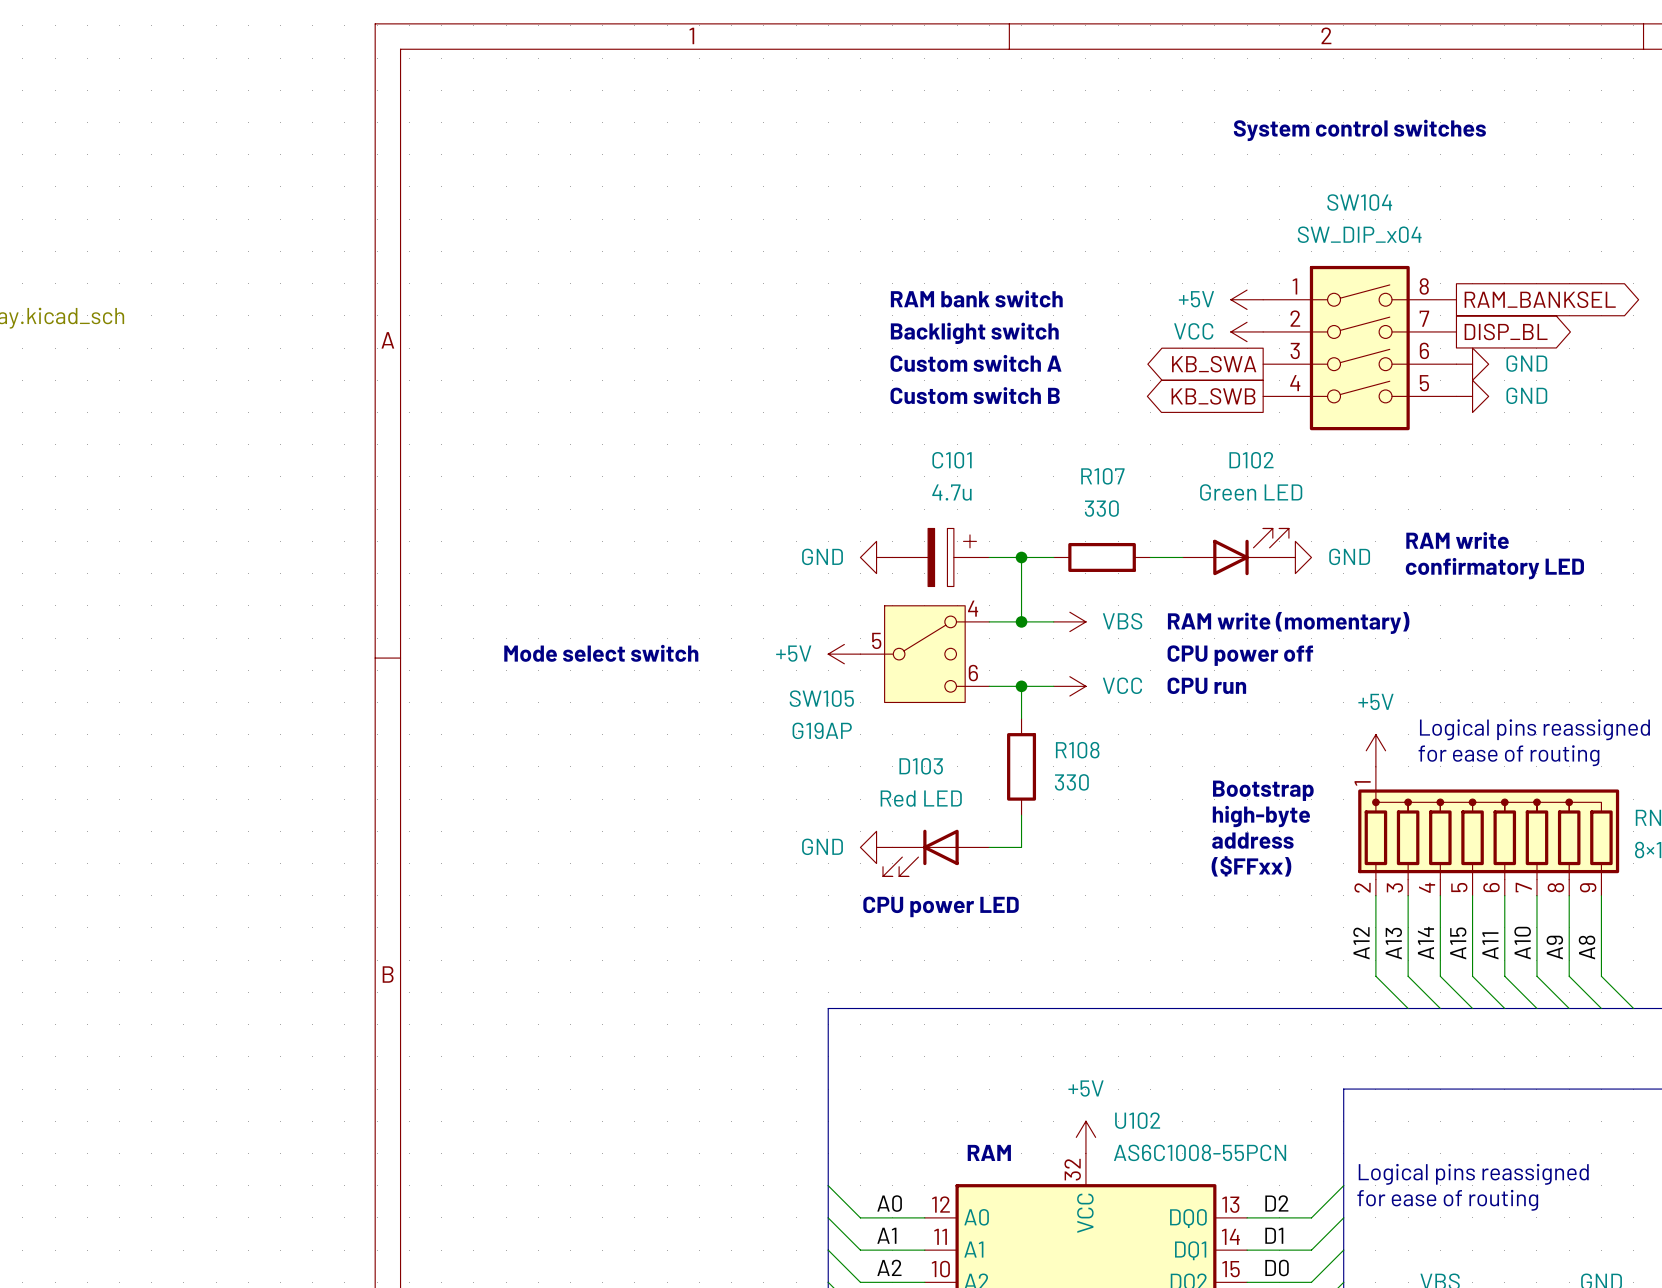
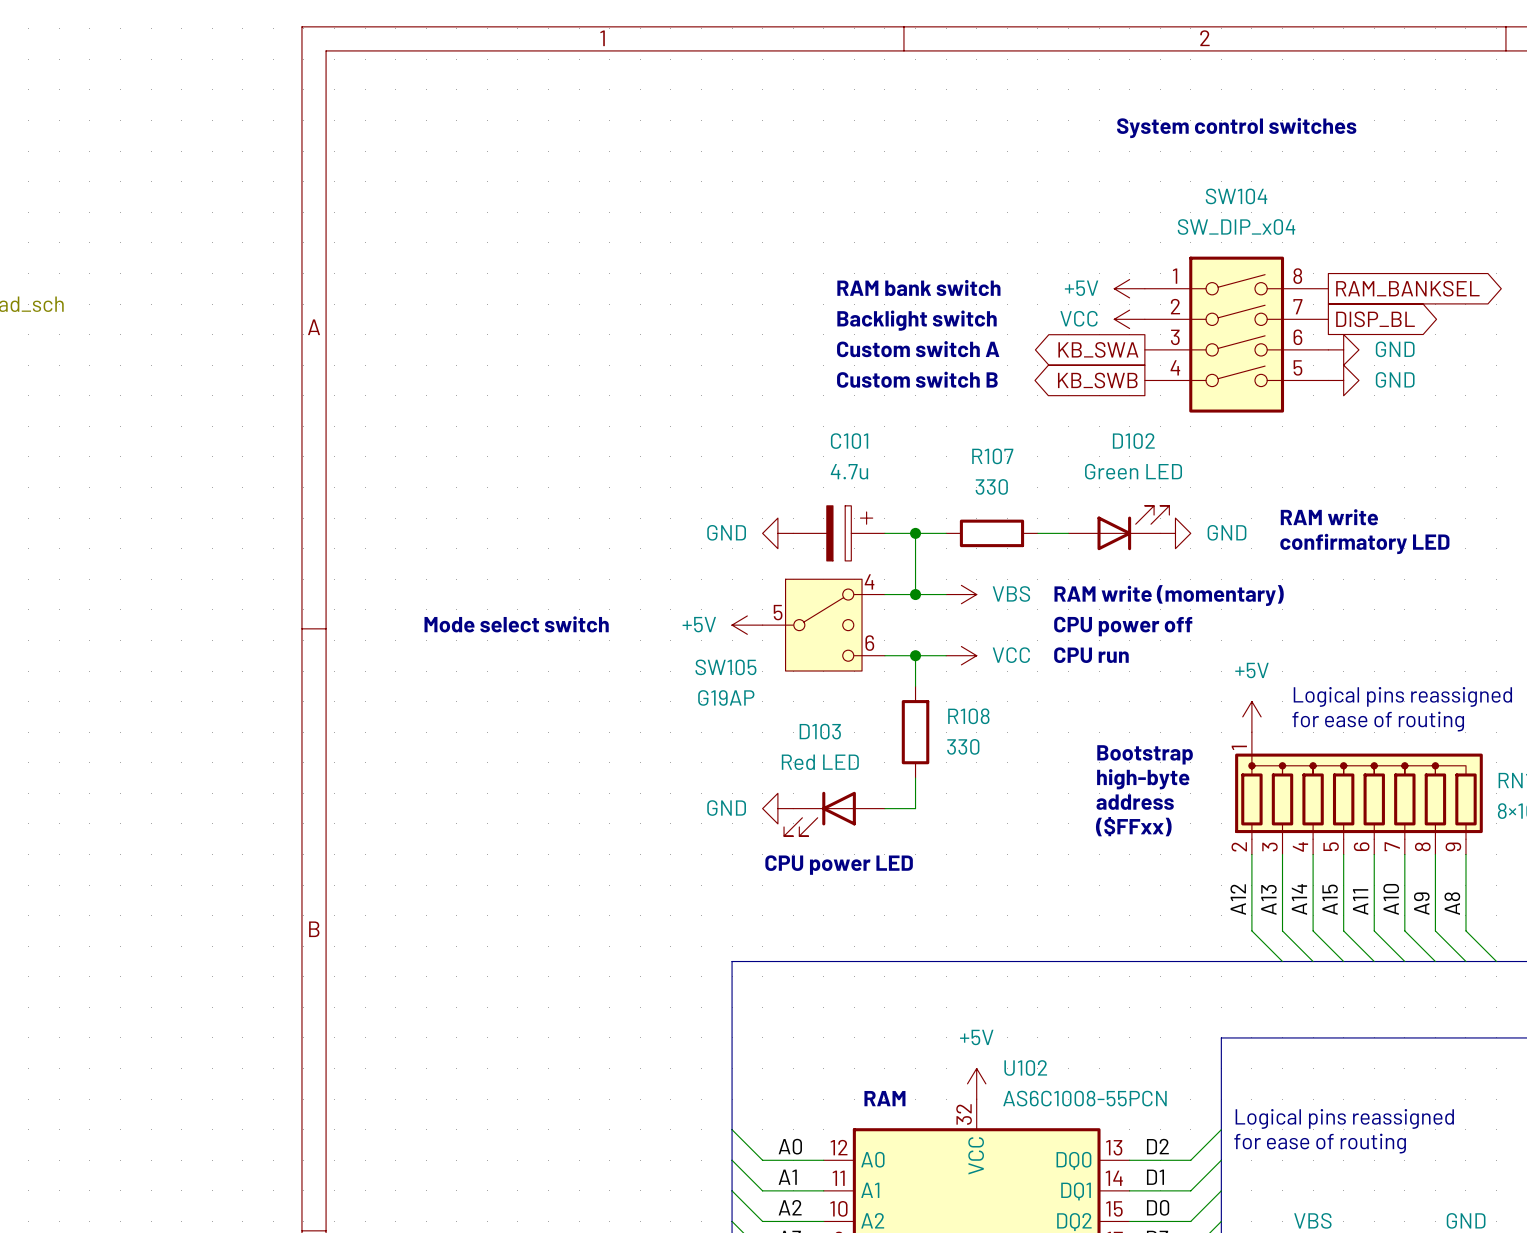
text position: RAM bank switch (976, 298) -> RAM bank switch (918, 287)
text position: Backlight switch (974, 333) -> Backlight switch (917, 320)
text position: Custom switch A (975, 363) -> Custom switch A (918, 349)
text position: Custom switch B (975, 395) -> Custom switch B (917, 379)

